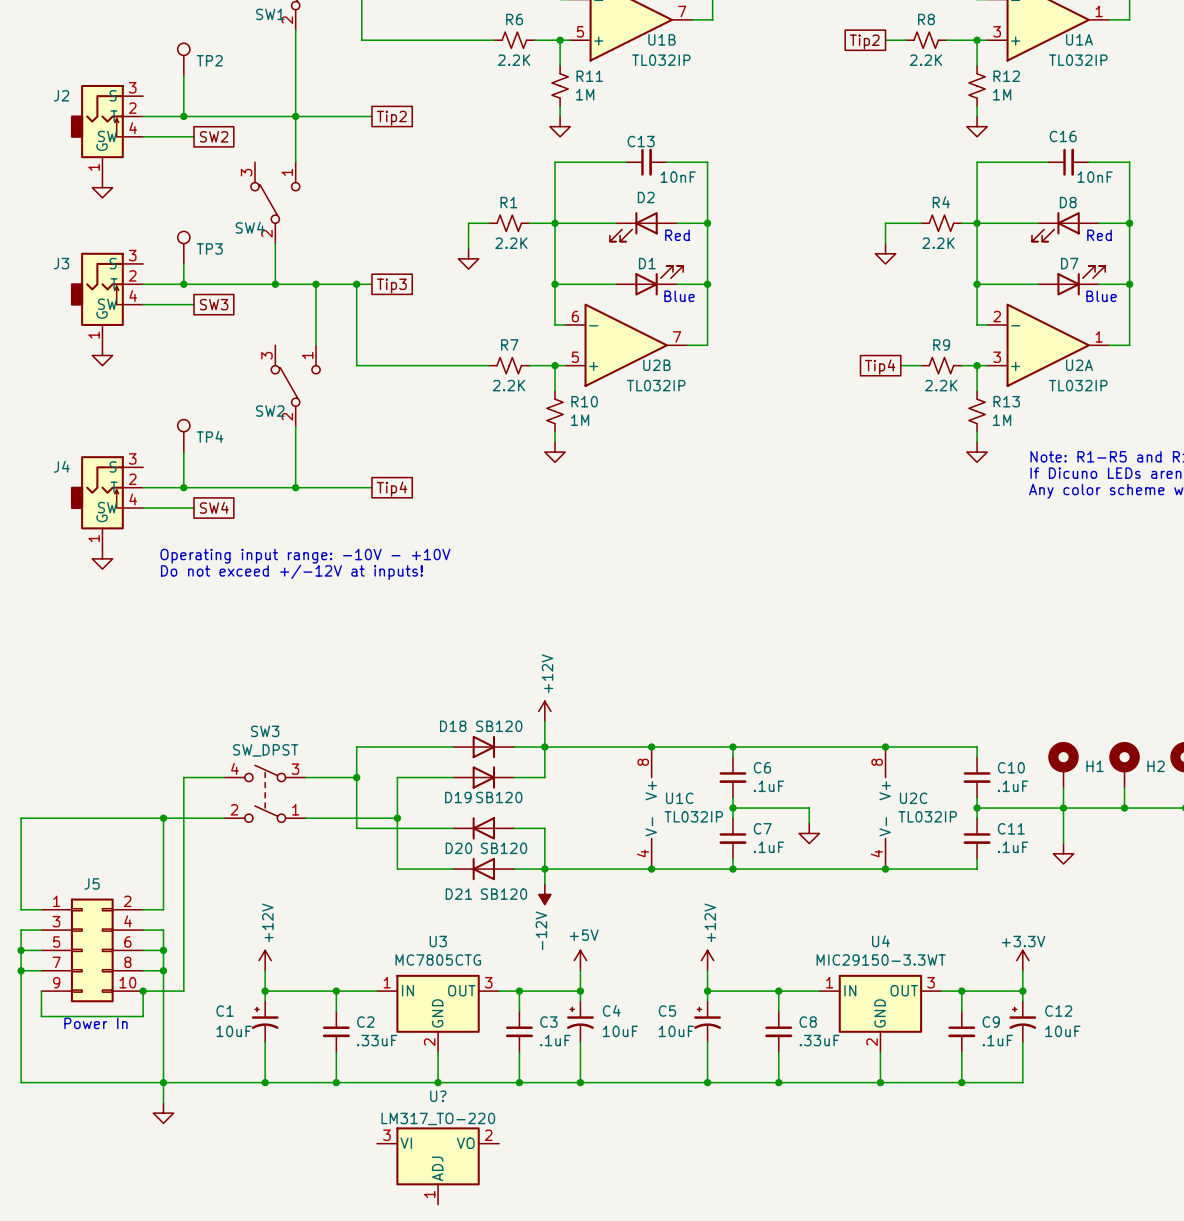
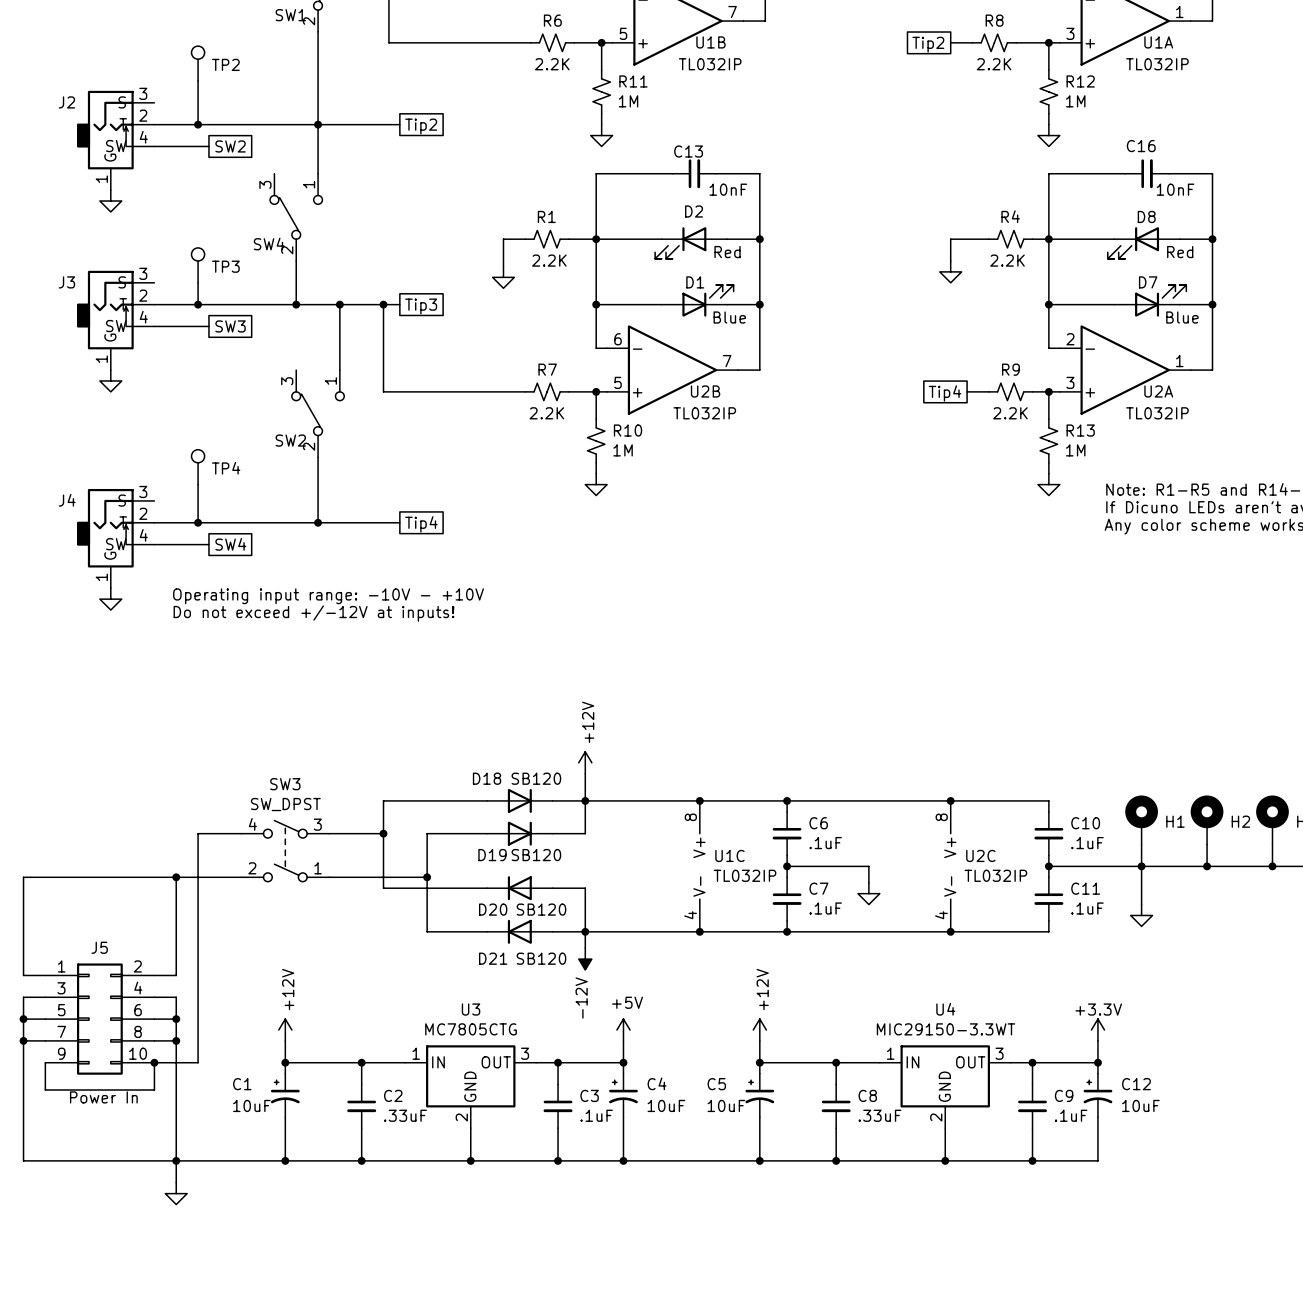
U?: LM317_TO-220 (438, 1166) -> none

